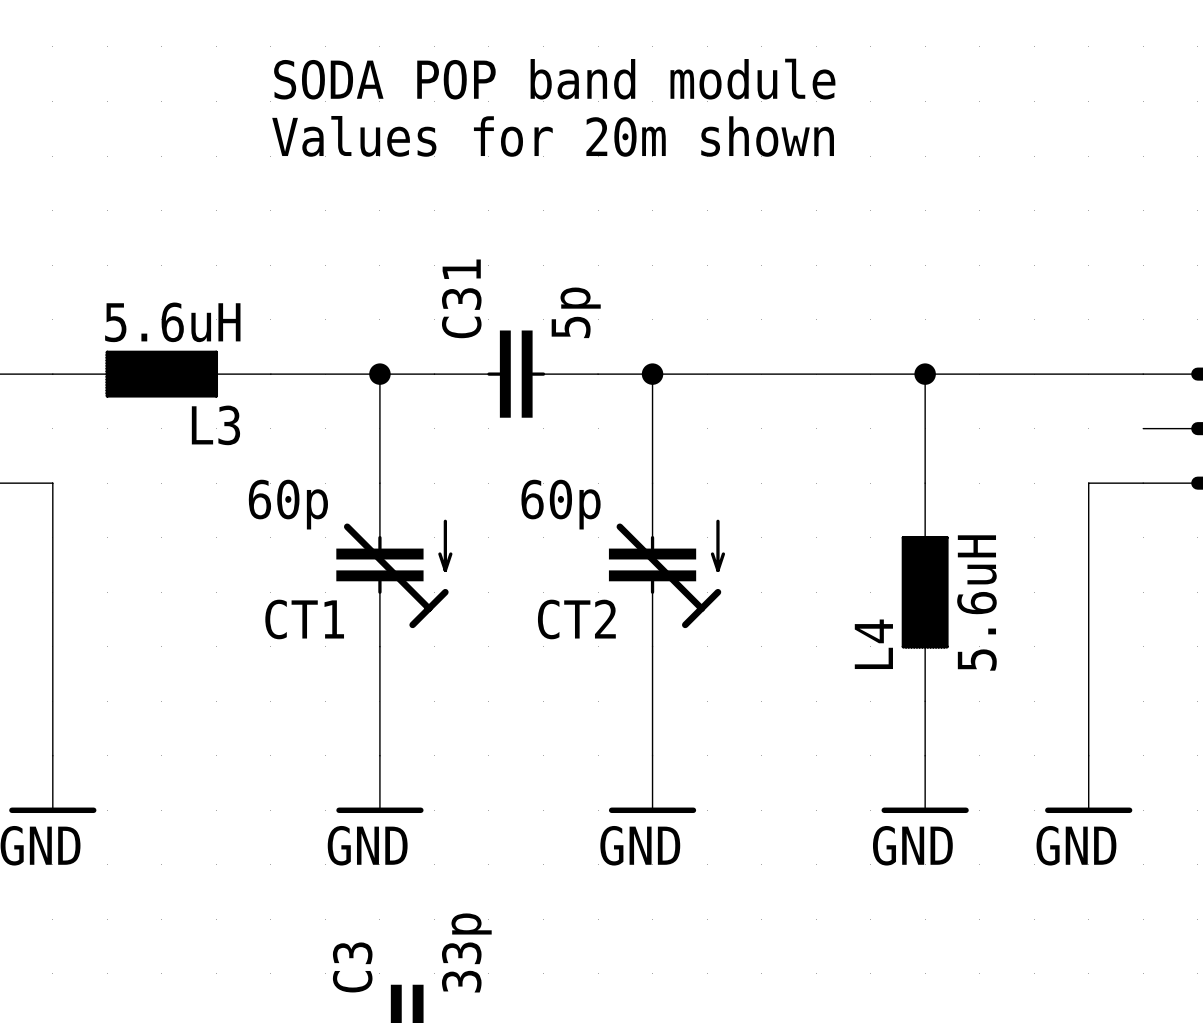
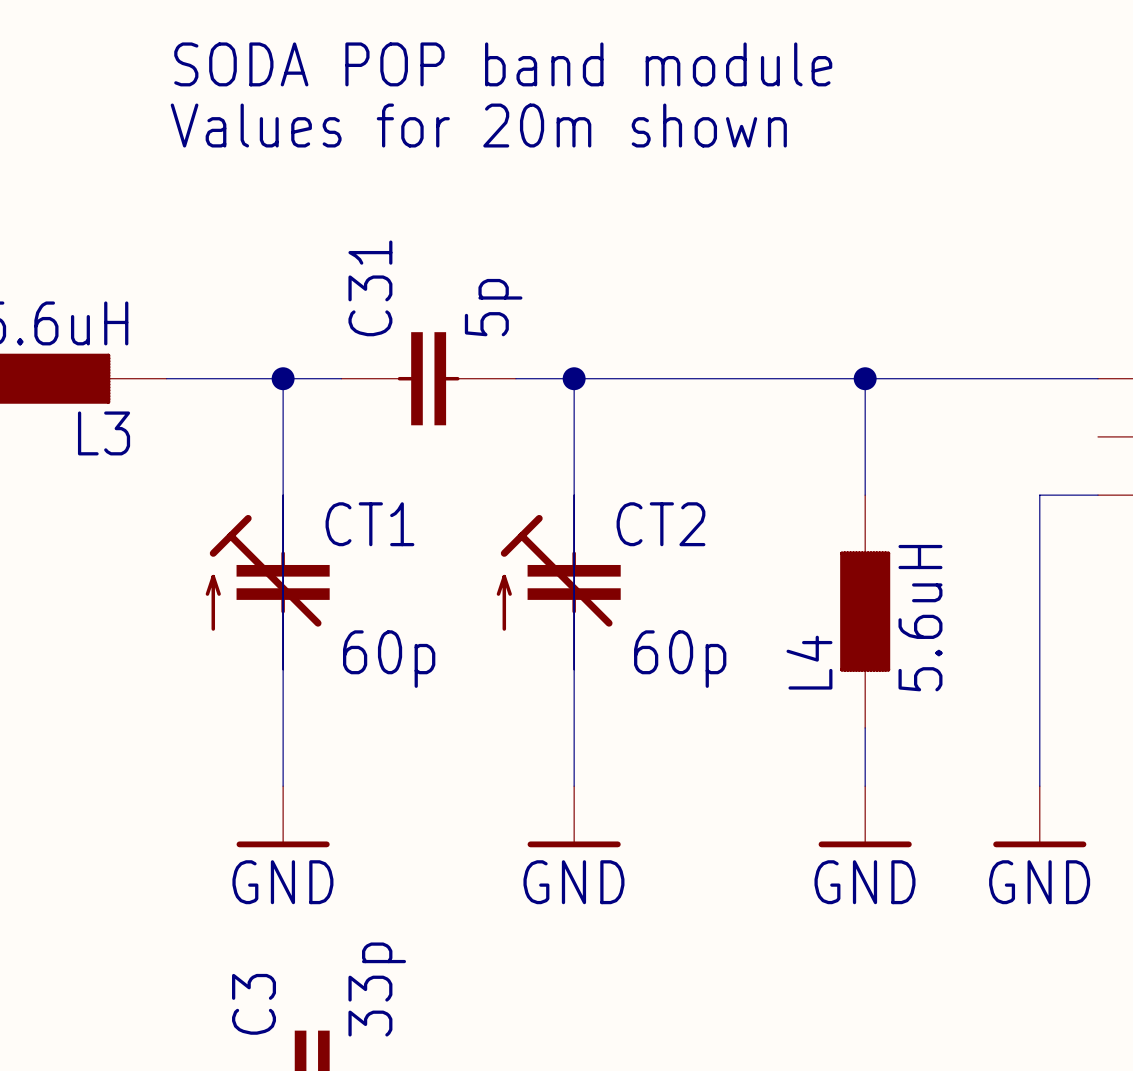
CT1 rotation: 0° (394, 573) -> 180° (267, 572)
CT2 rotation: 0° (666, 573) -> 180° (558, 572)

